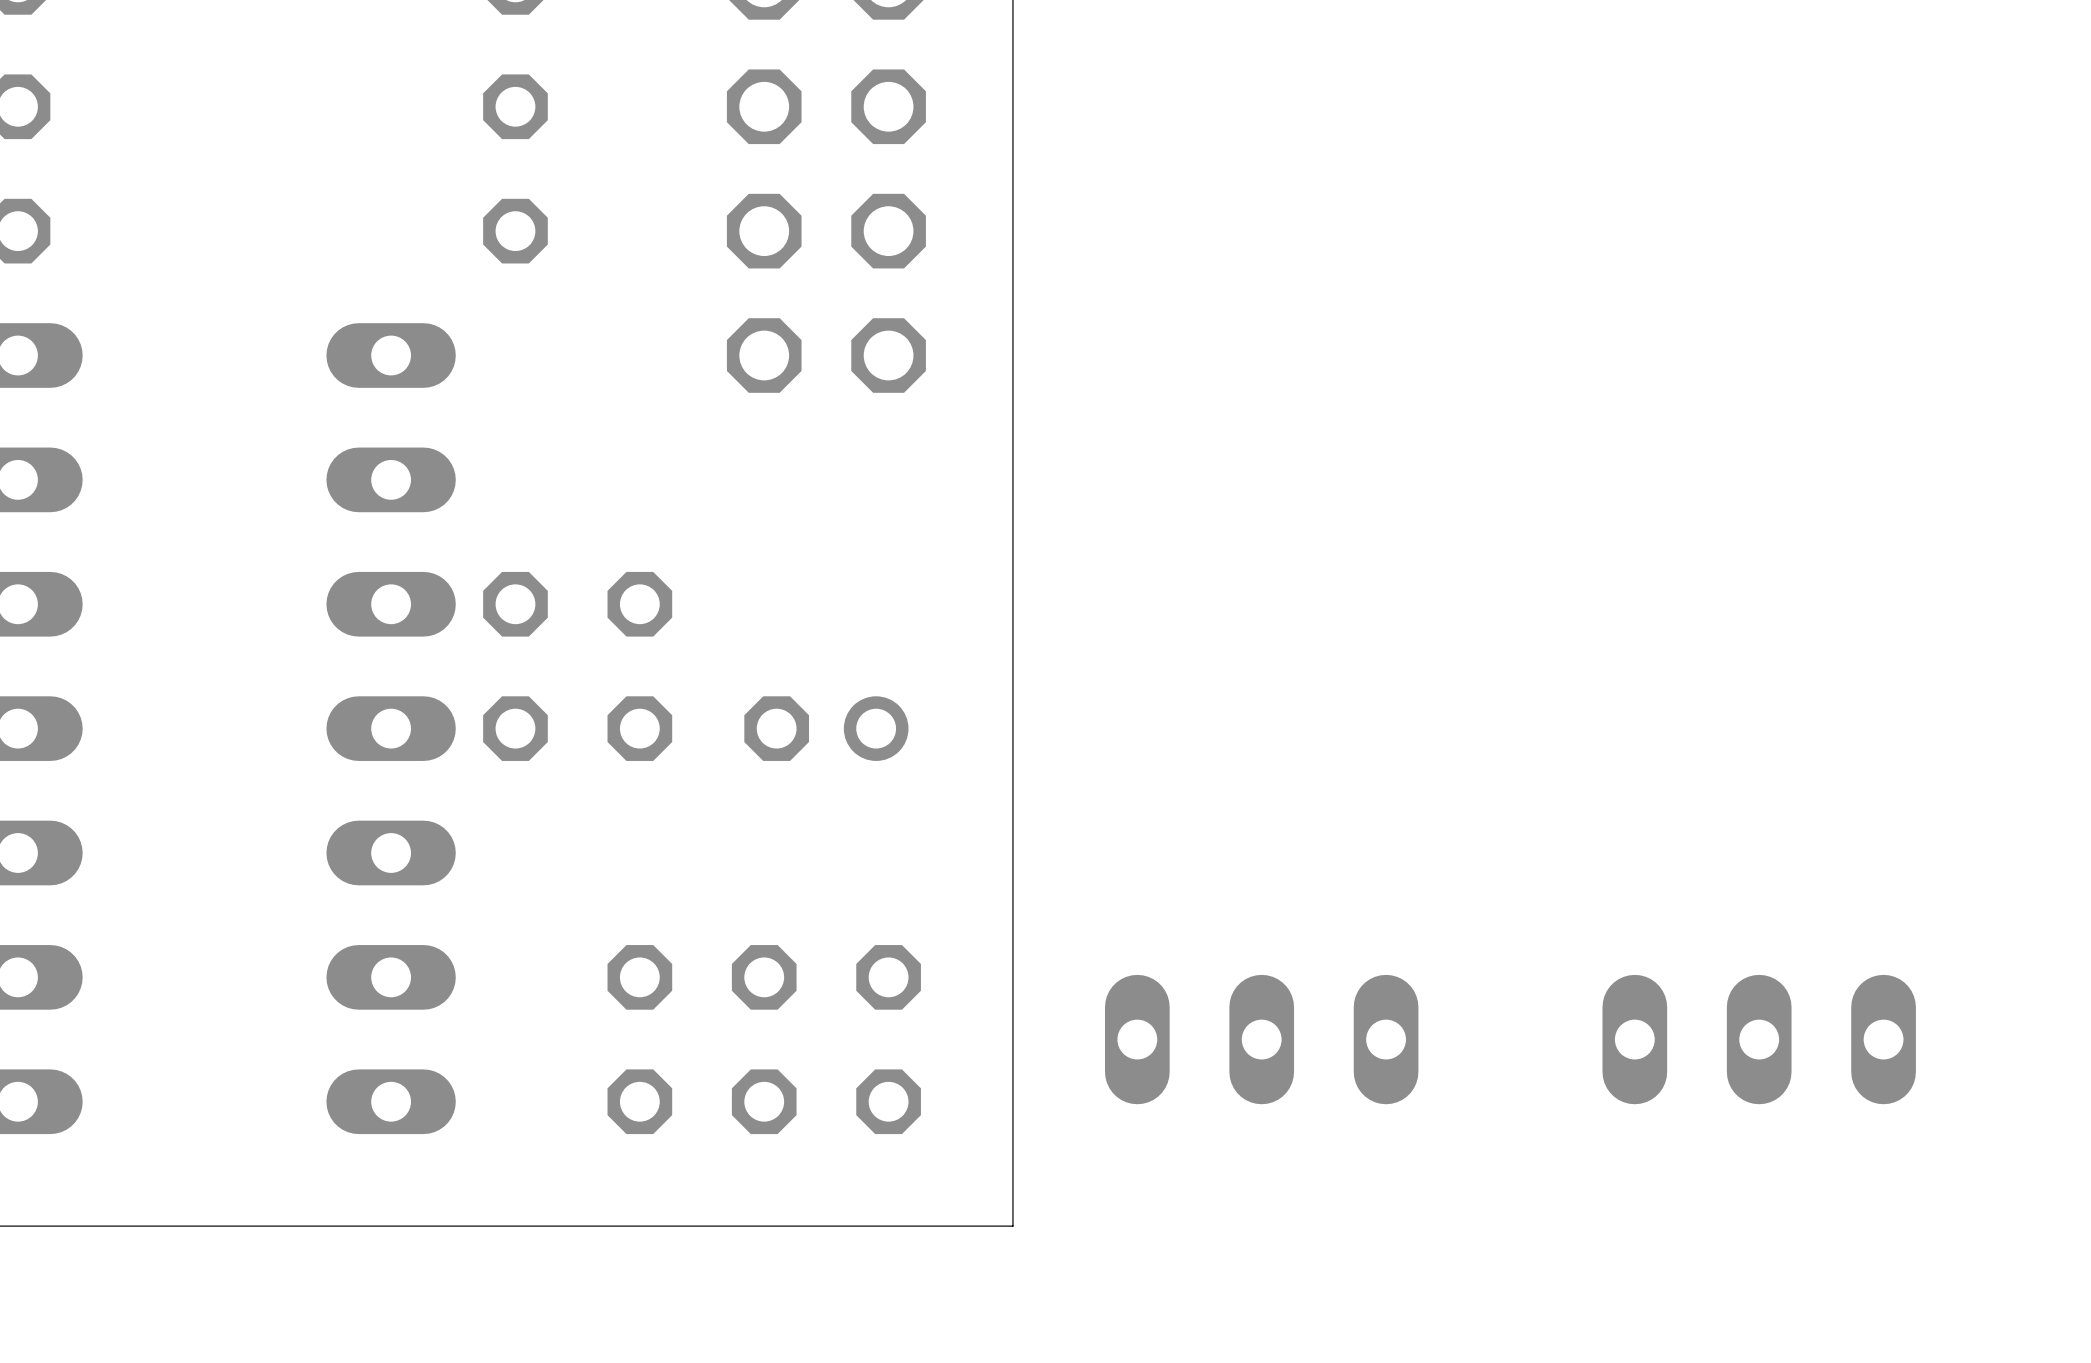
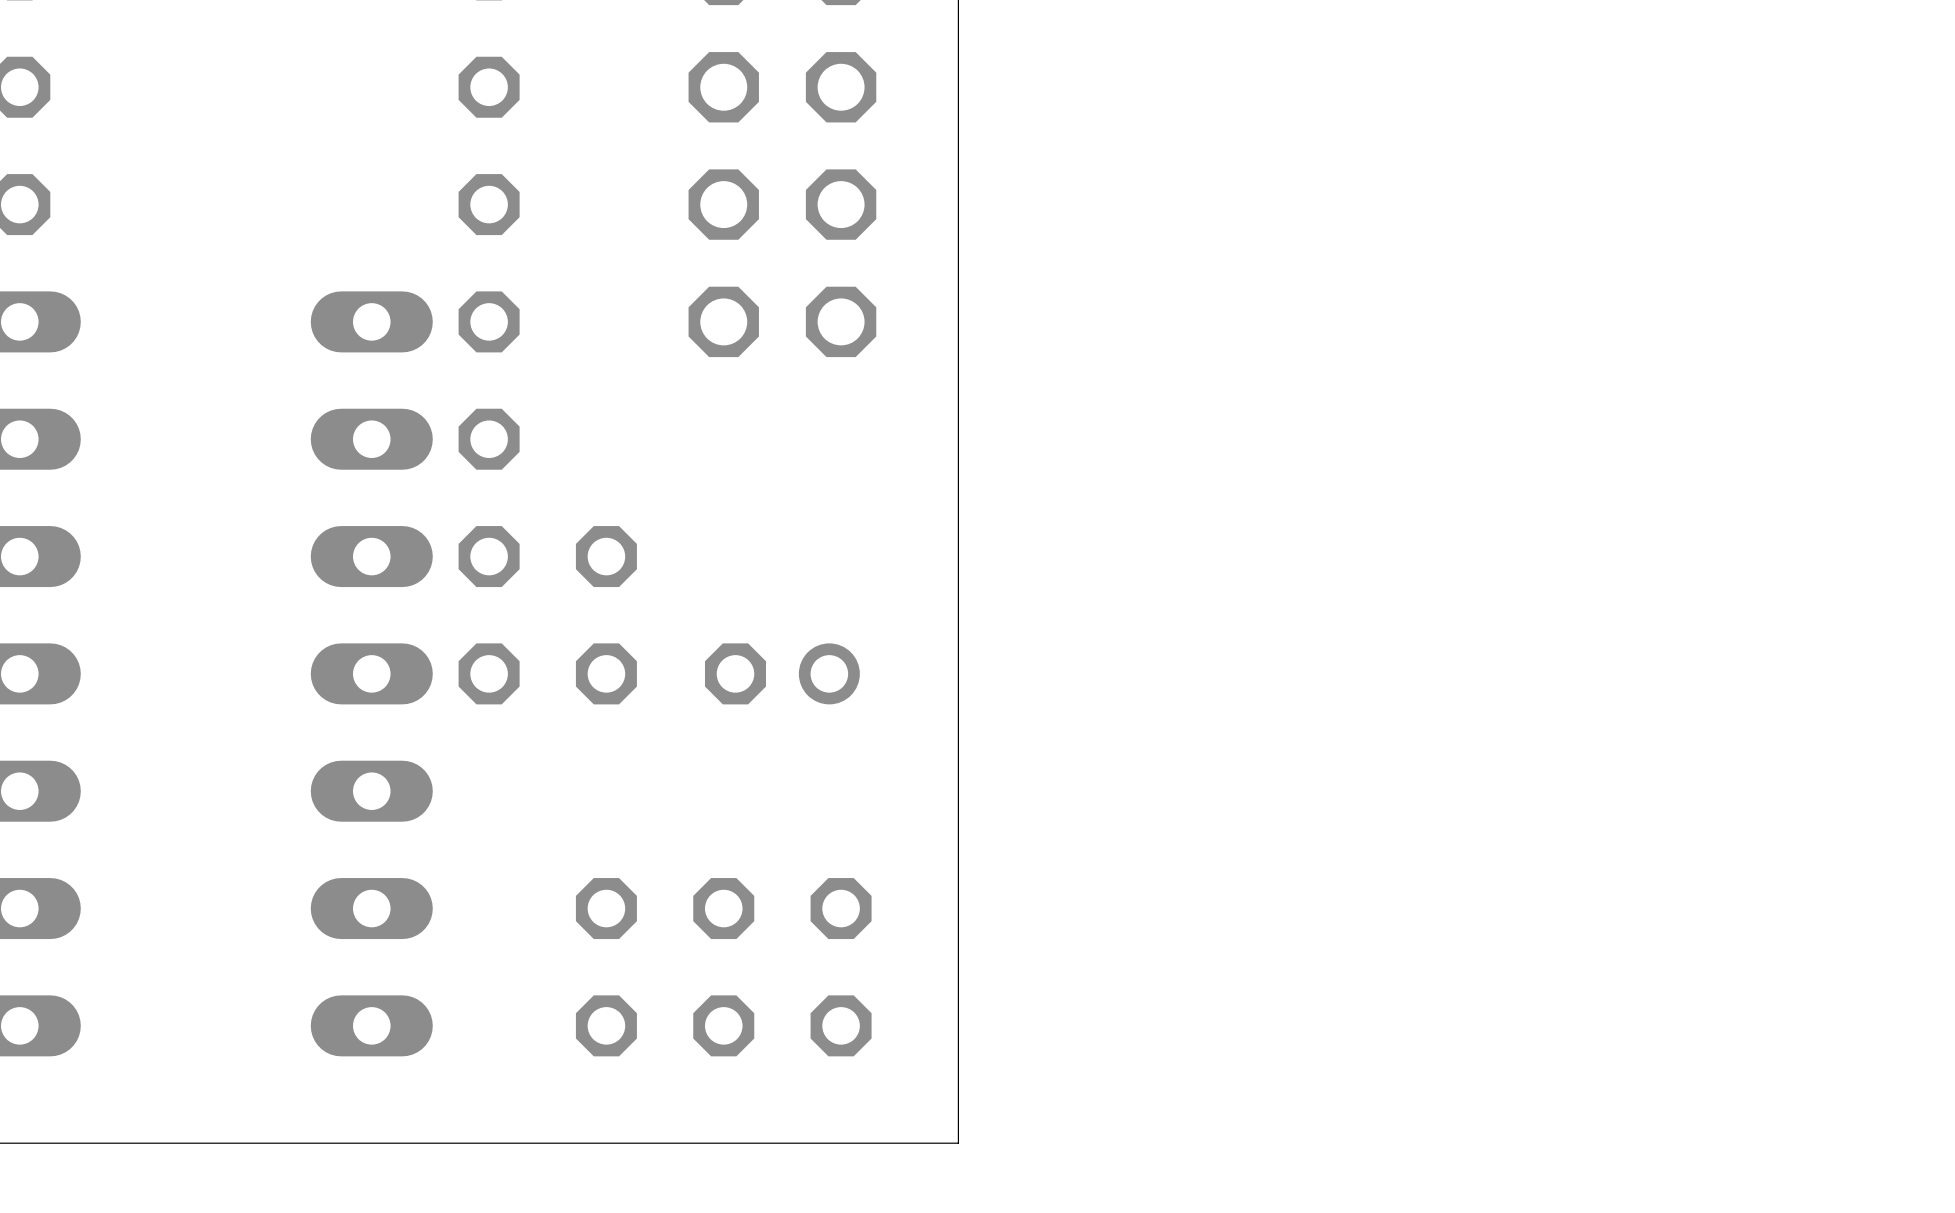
part: none -> (489, 380)
part: (1261, 1039) -> none
part: (1759, 1039) -> none

